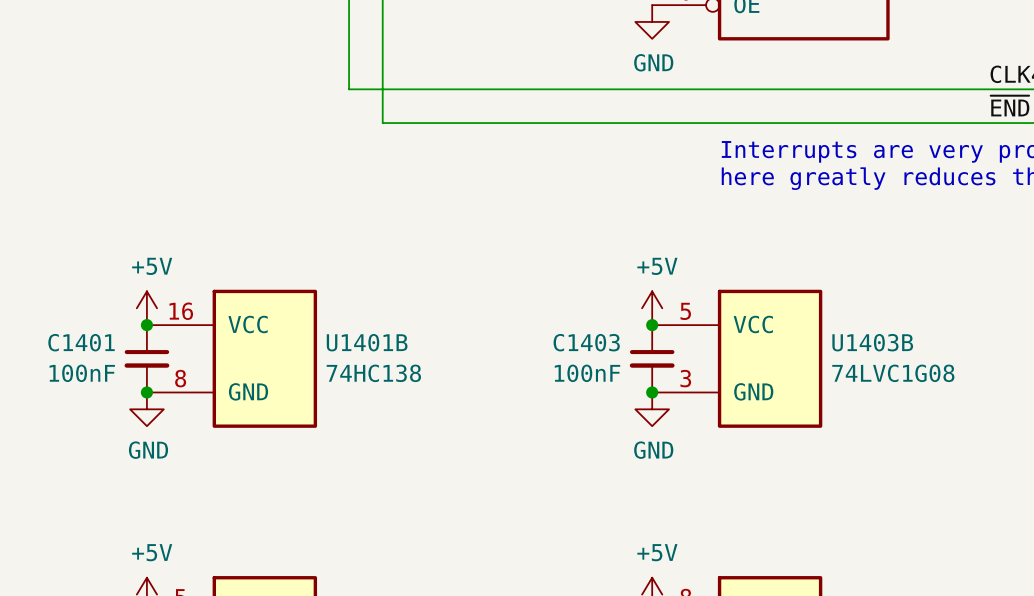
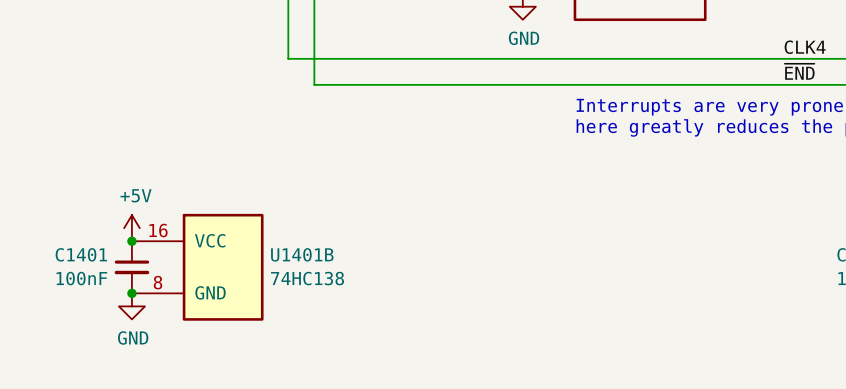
power symbol: +5V (652, 308) -> none
junction: (652, 325) -> none
C1403: 100nF (652, 358) -> none
U1403B: 74LVC1G08 (737, 358) -> none
junction: (652, 392) -> none
power symbol: GND (652, 409) -> none

